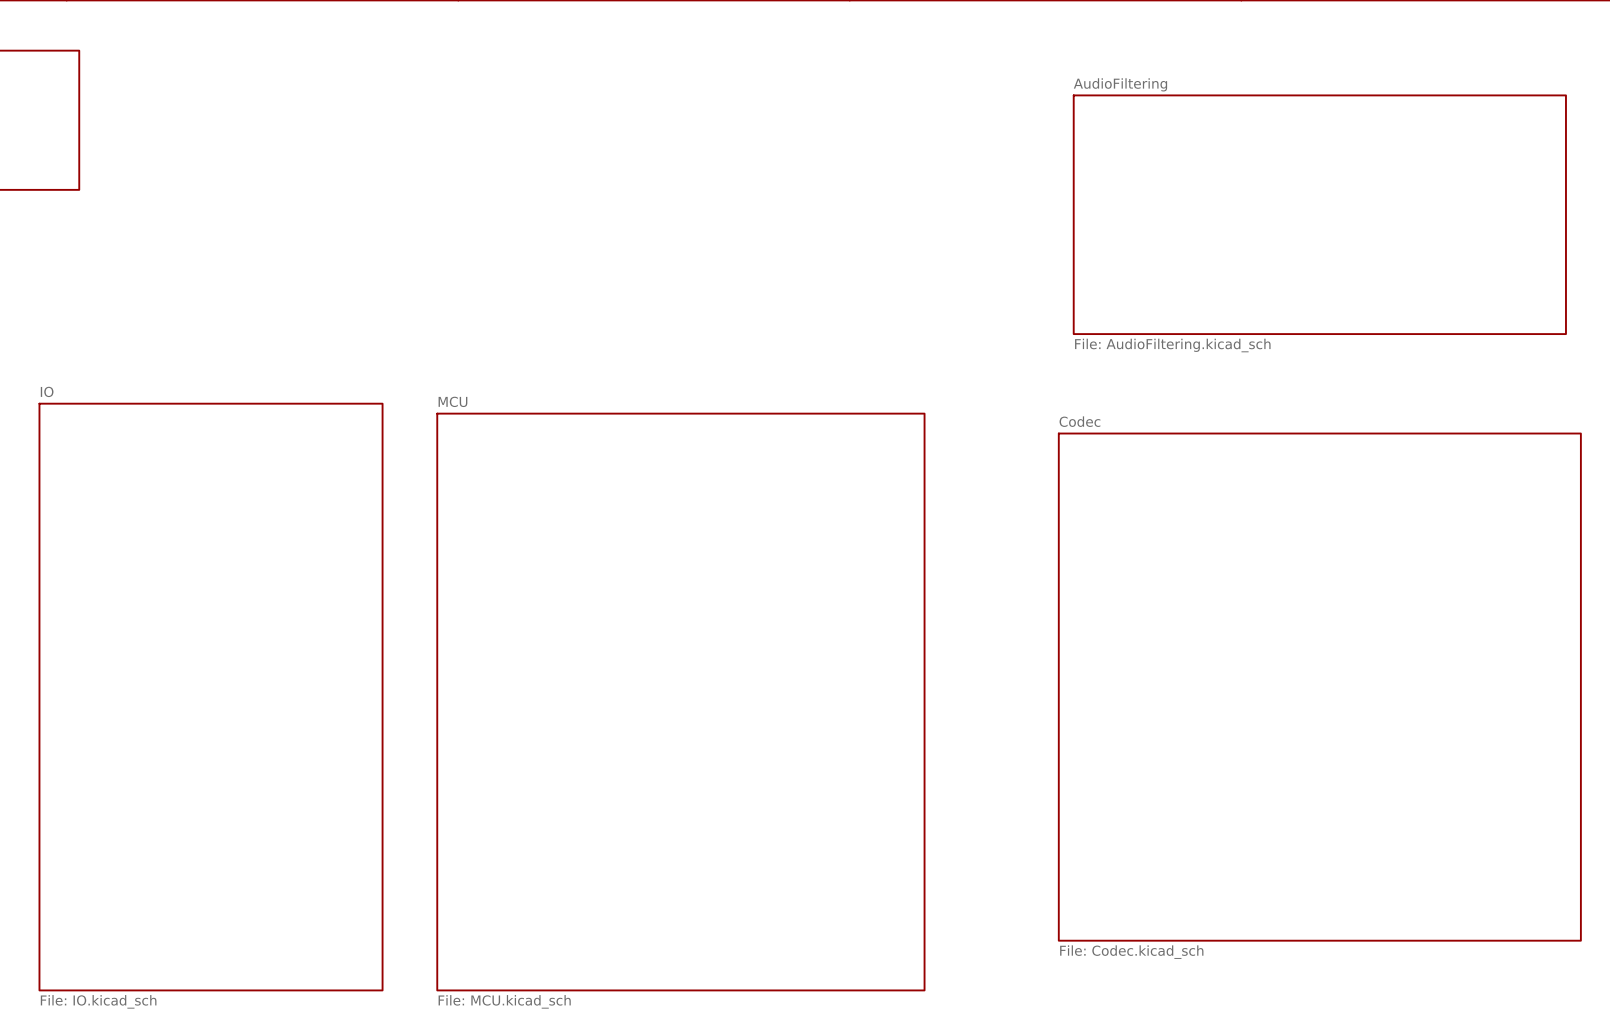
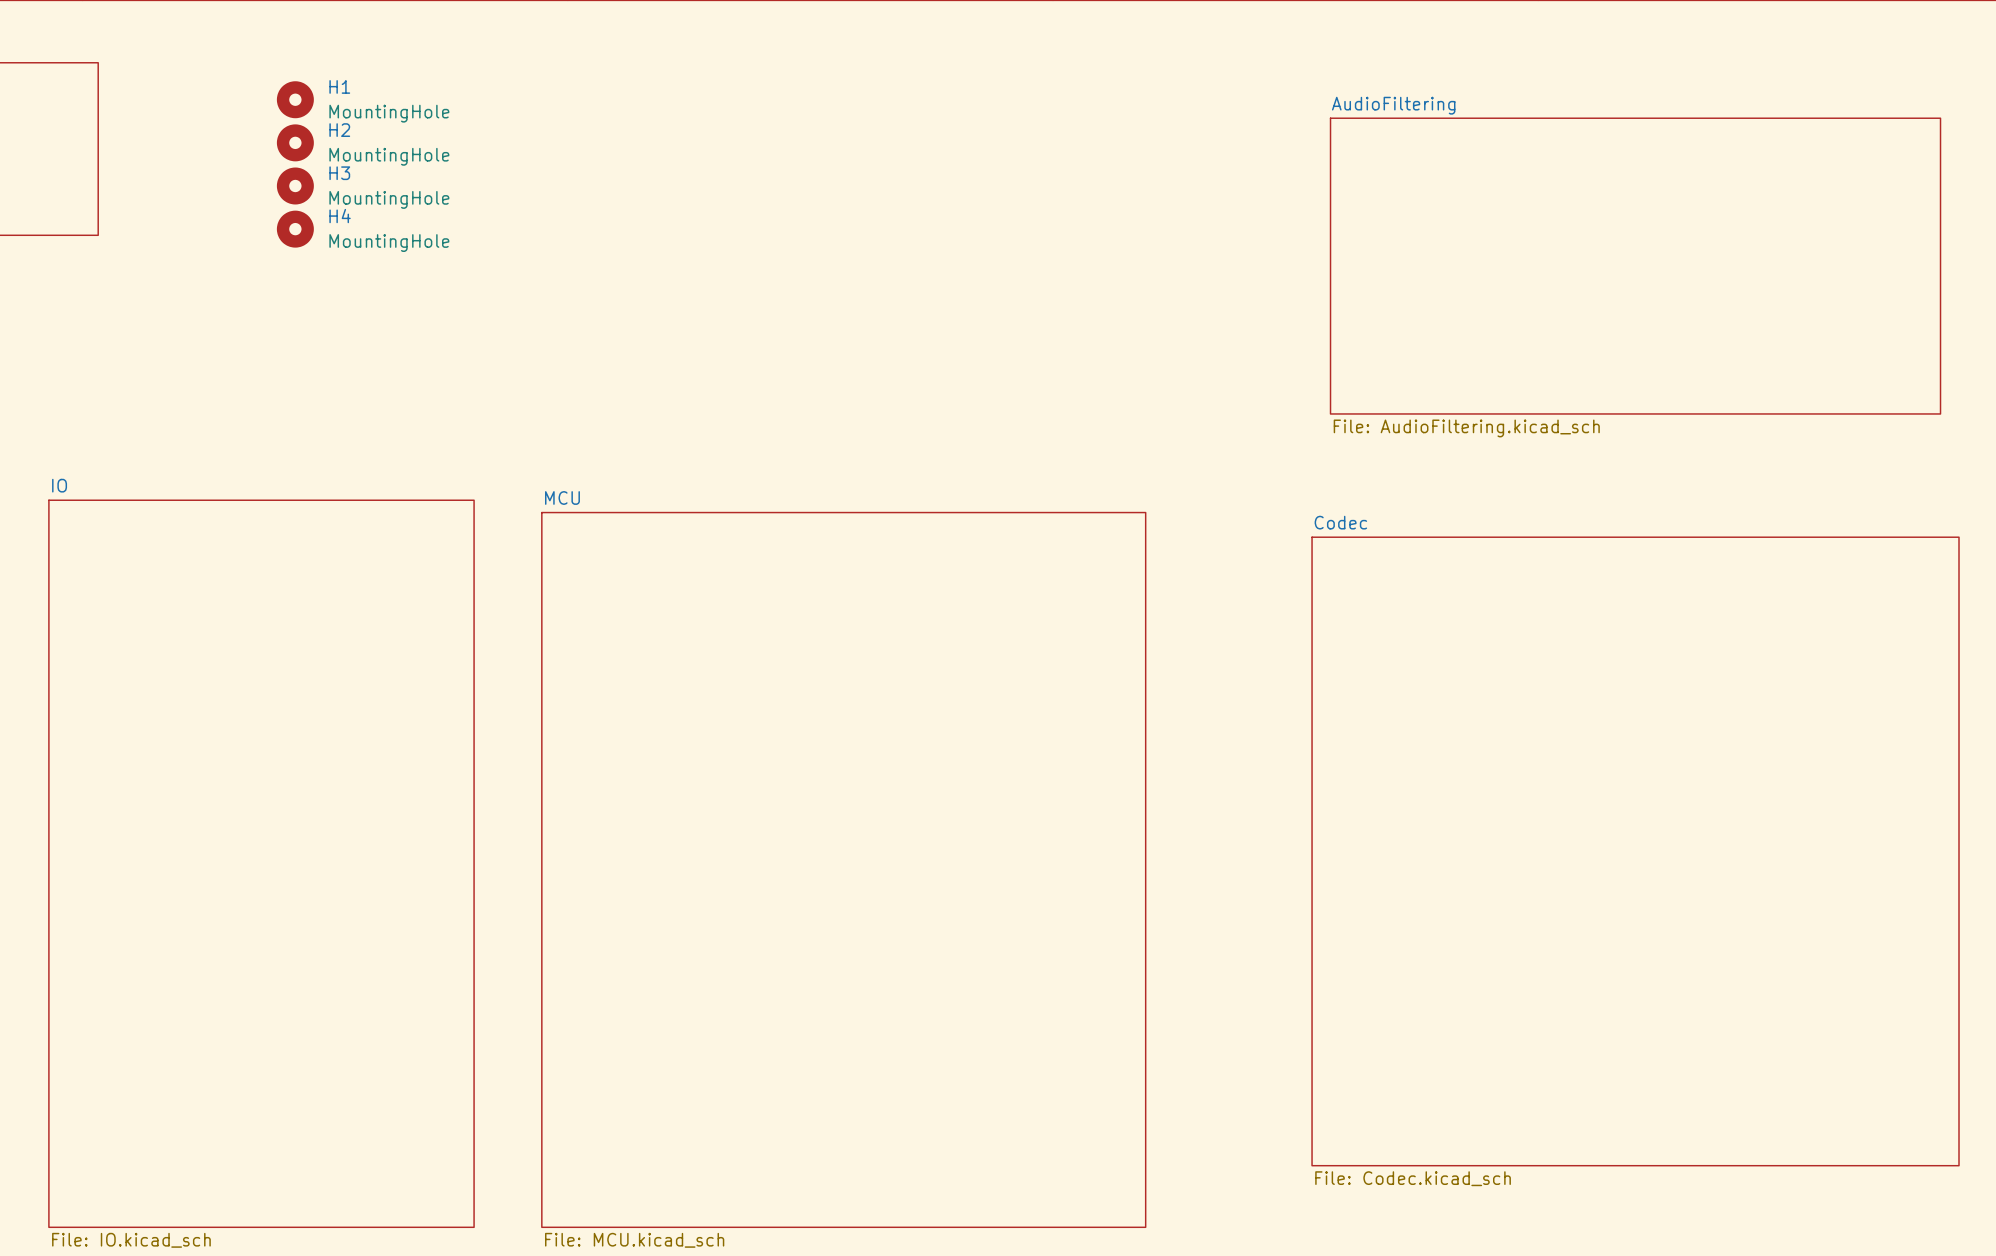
H1: none -> MountingHole (295, 99)
H2: none -> MountingHole (295, 142)
H3: none -> MountingHole (295, 185)
H4: none -> MountingHole (295, 229)

